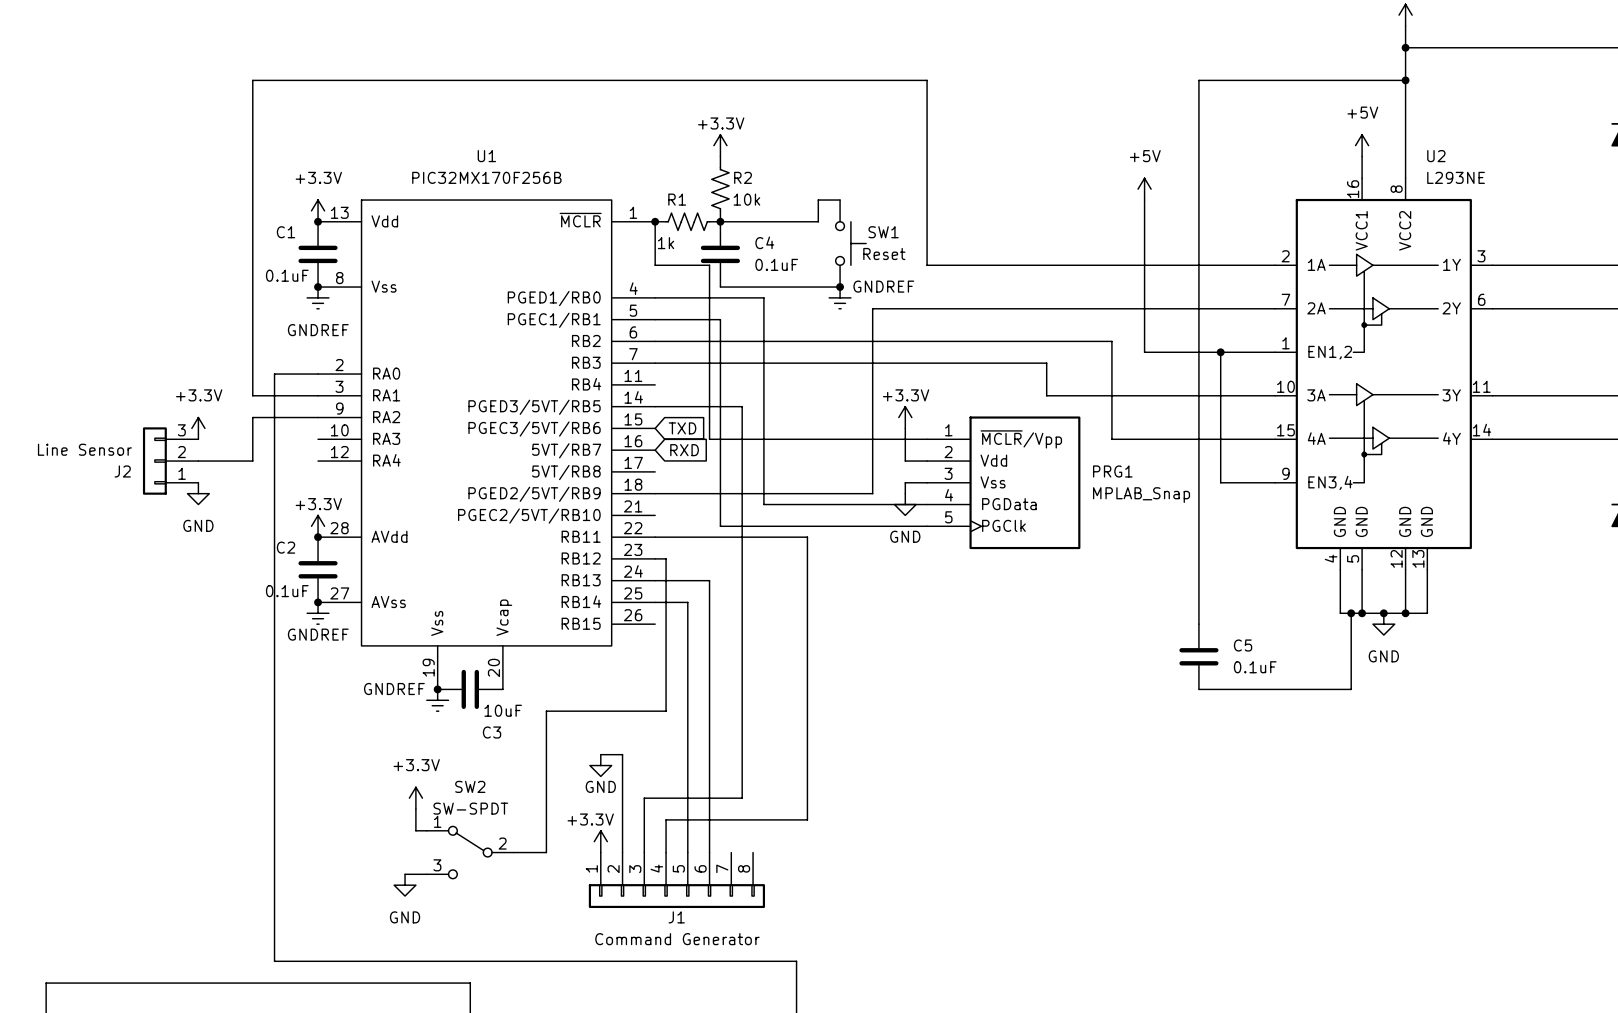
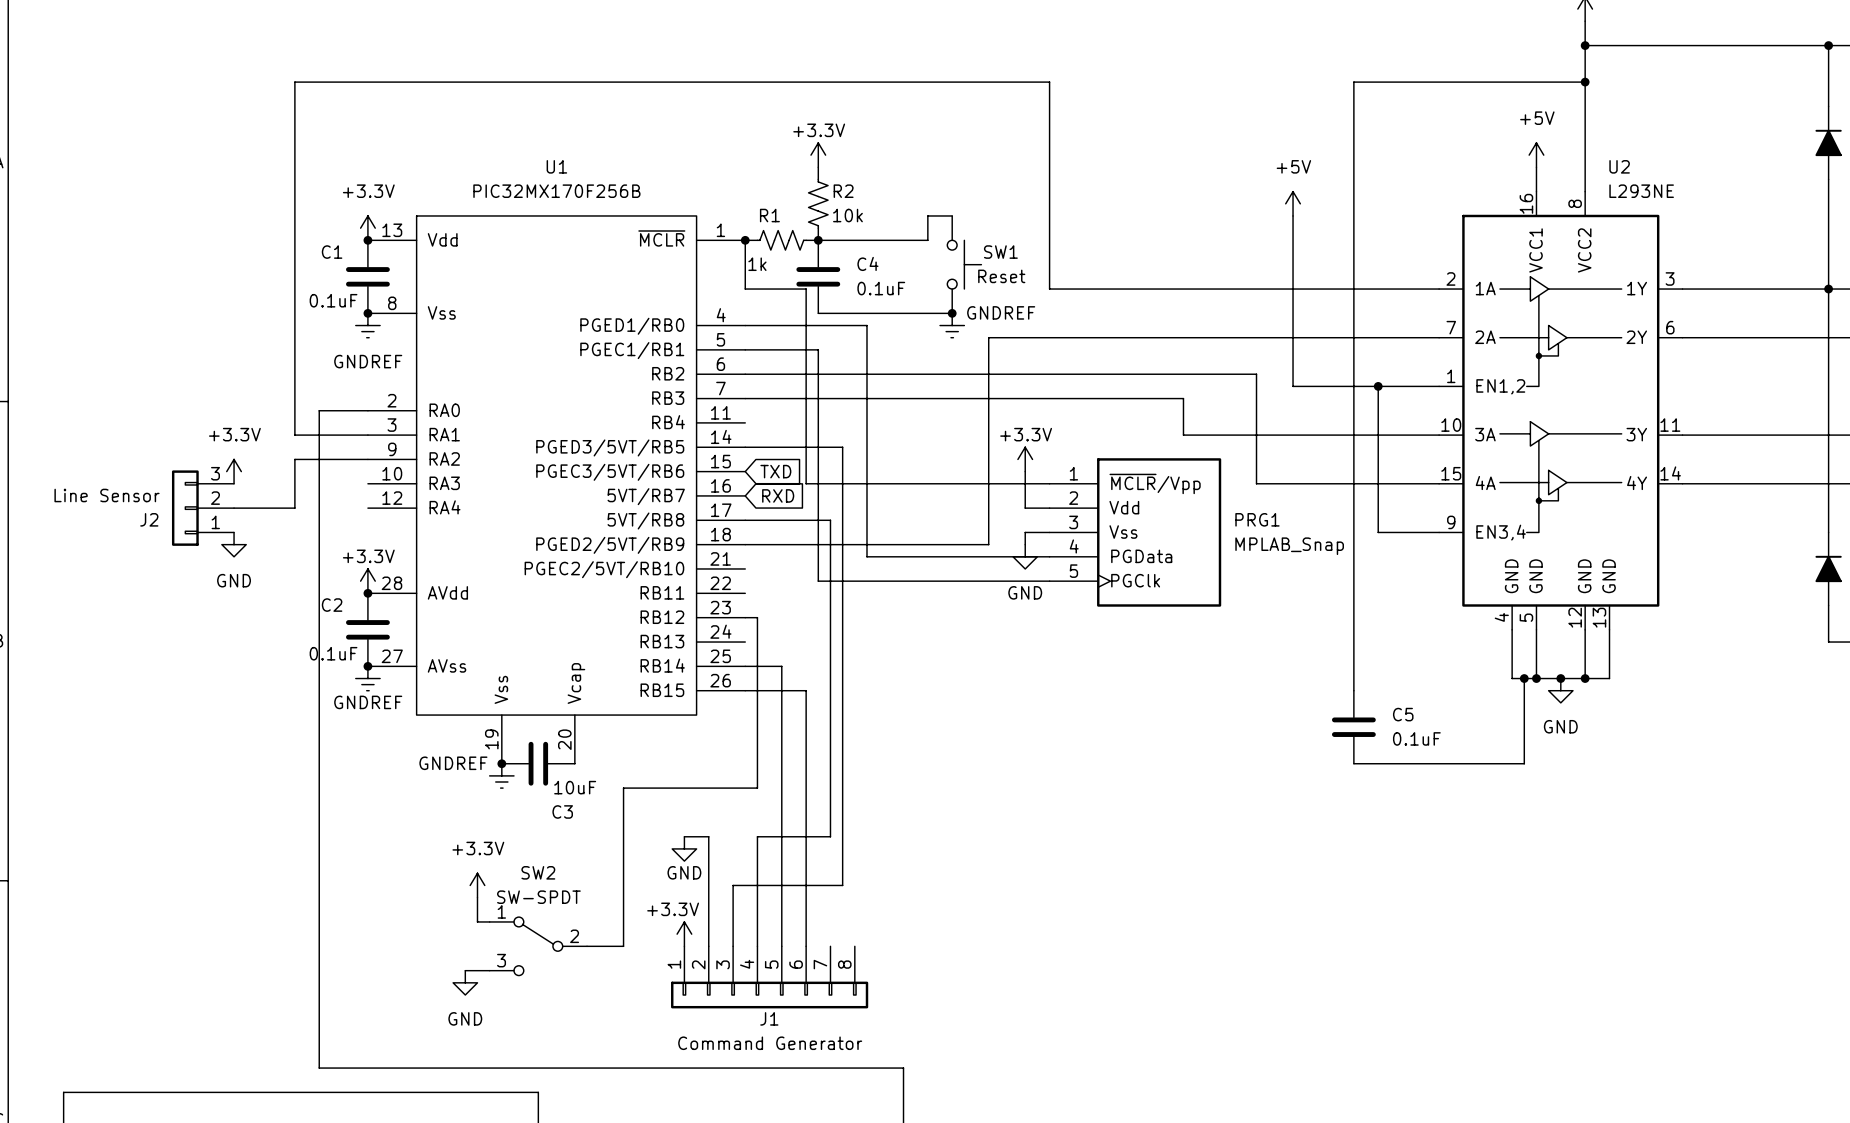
wire: (655, 537) (807, 537) (807, 819) (666, 819) -> (745, 520) (830, 520) (830, 836) (757, 836) (757, 909)
wire: (655, 580) (709, 580) (709, 624) -> (745, 690) (806, 690)

